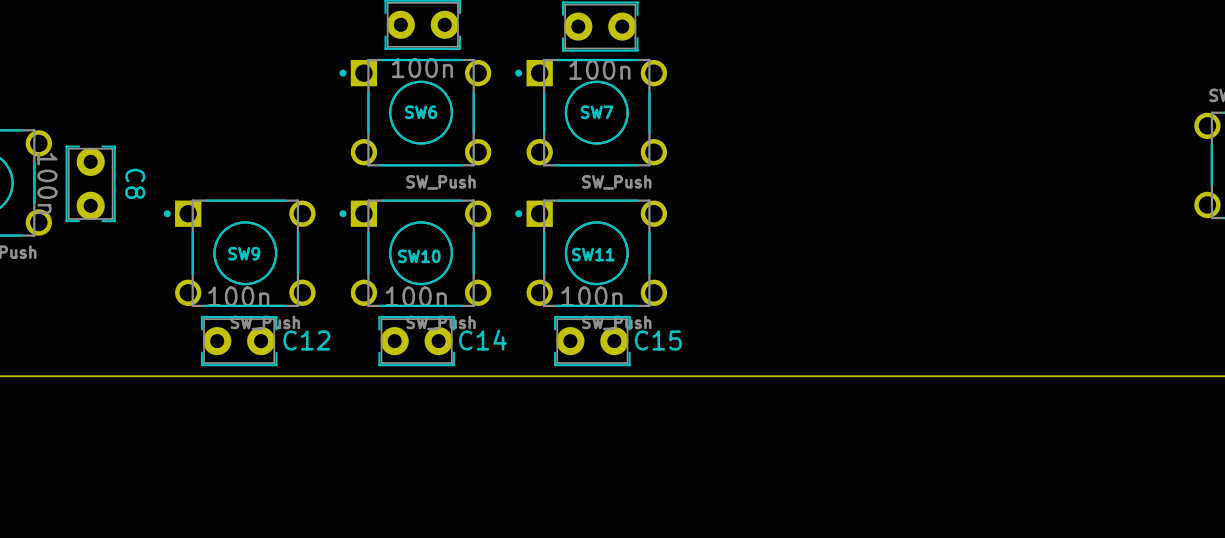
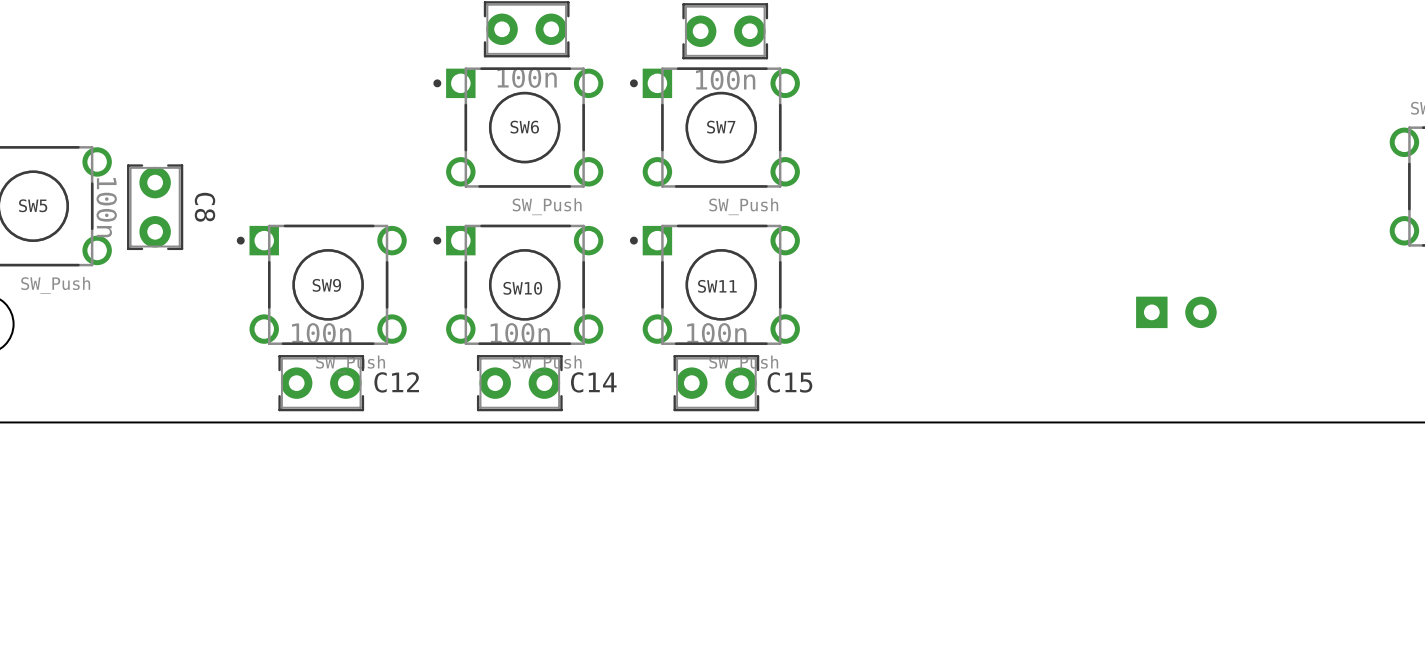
part: none -> (1176, 312)

